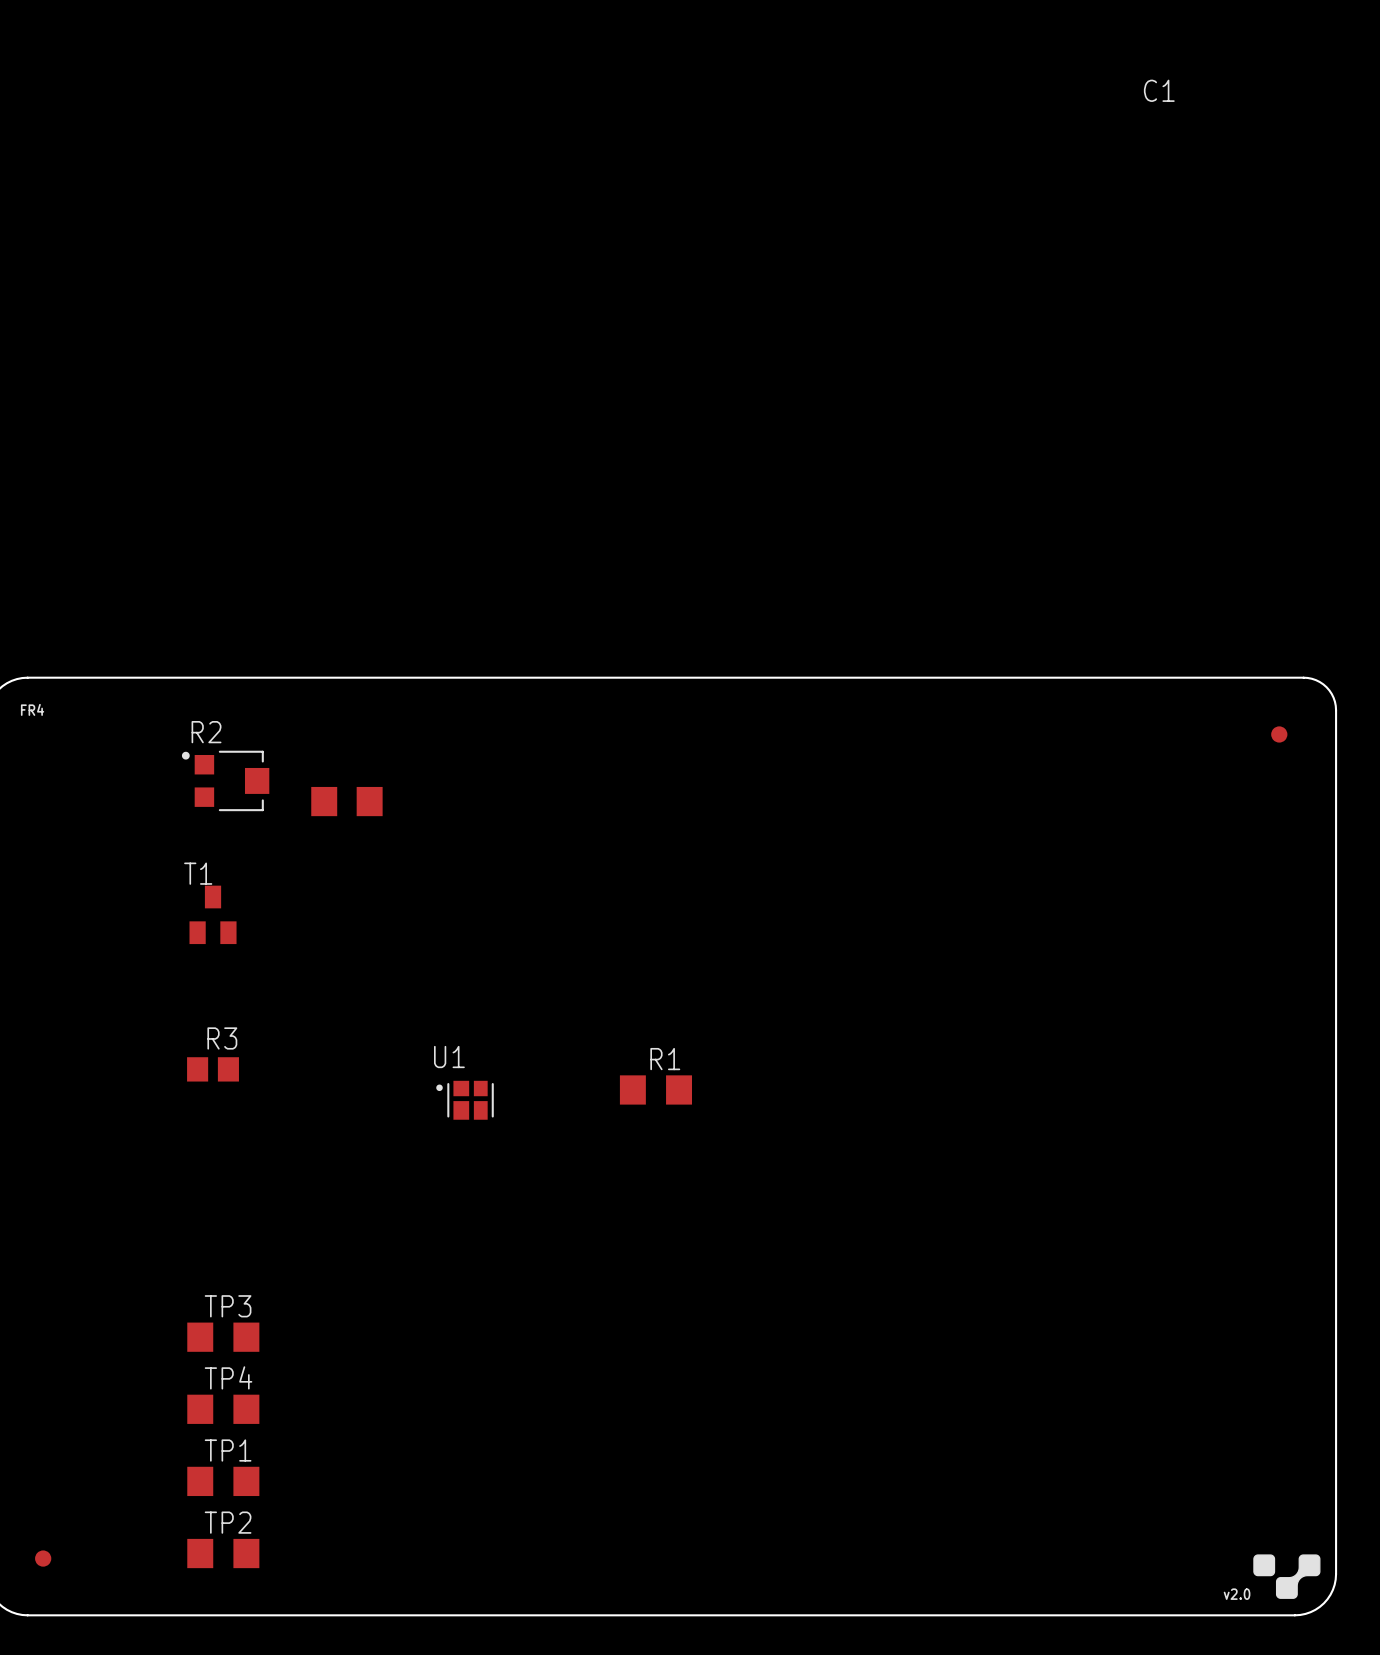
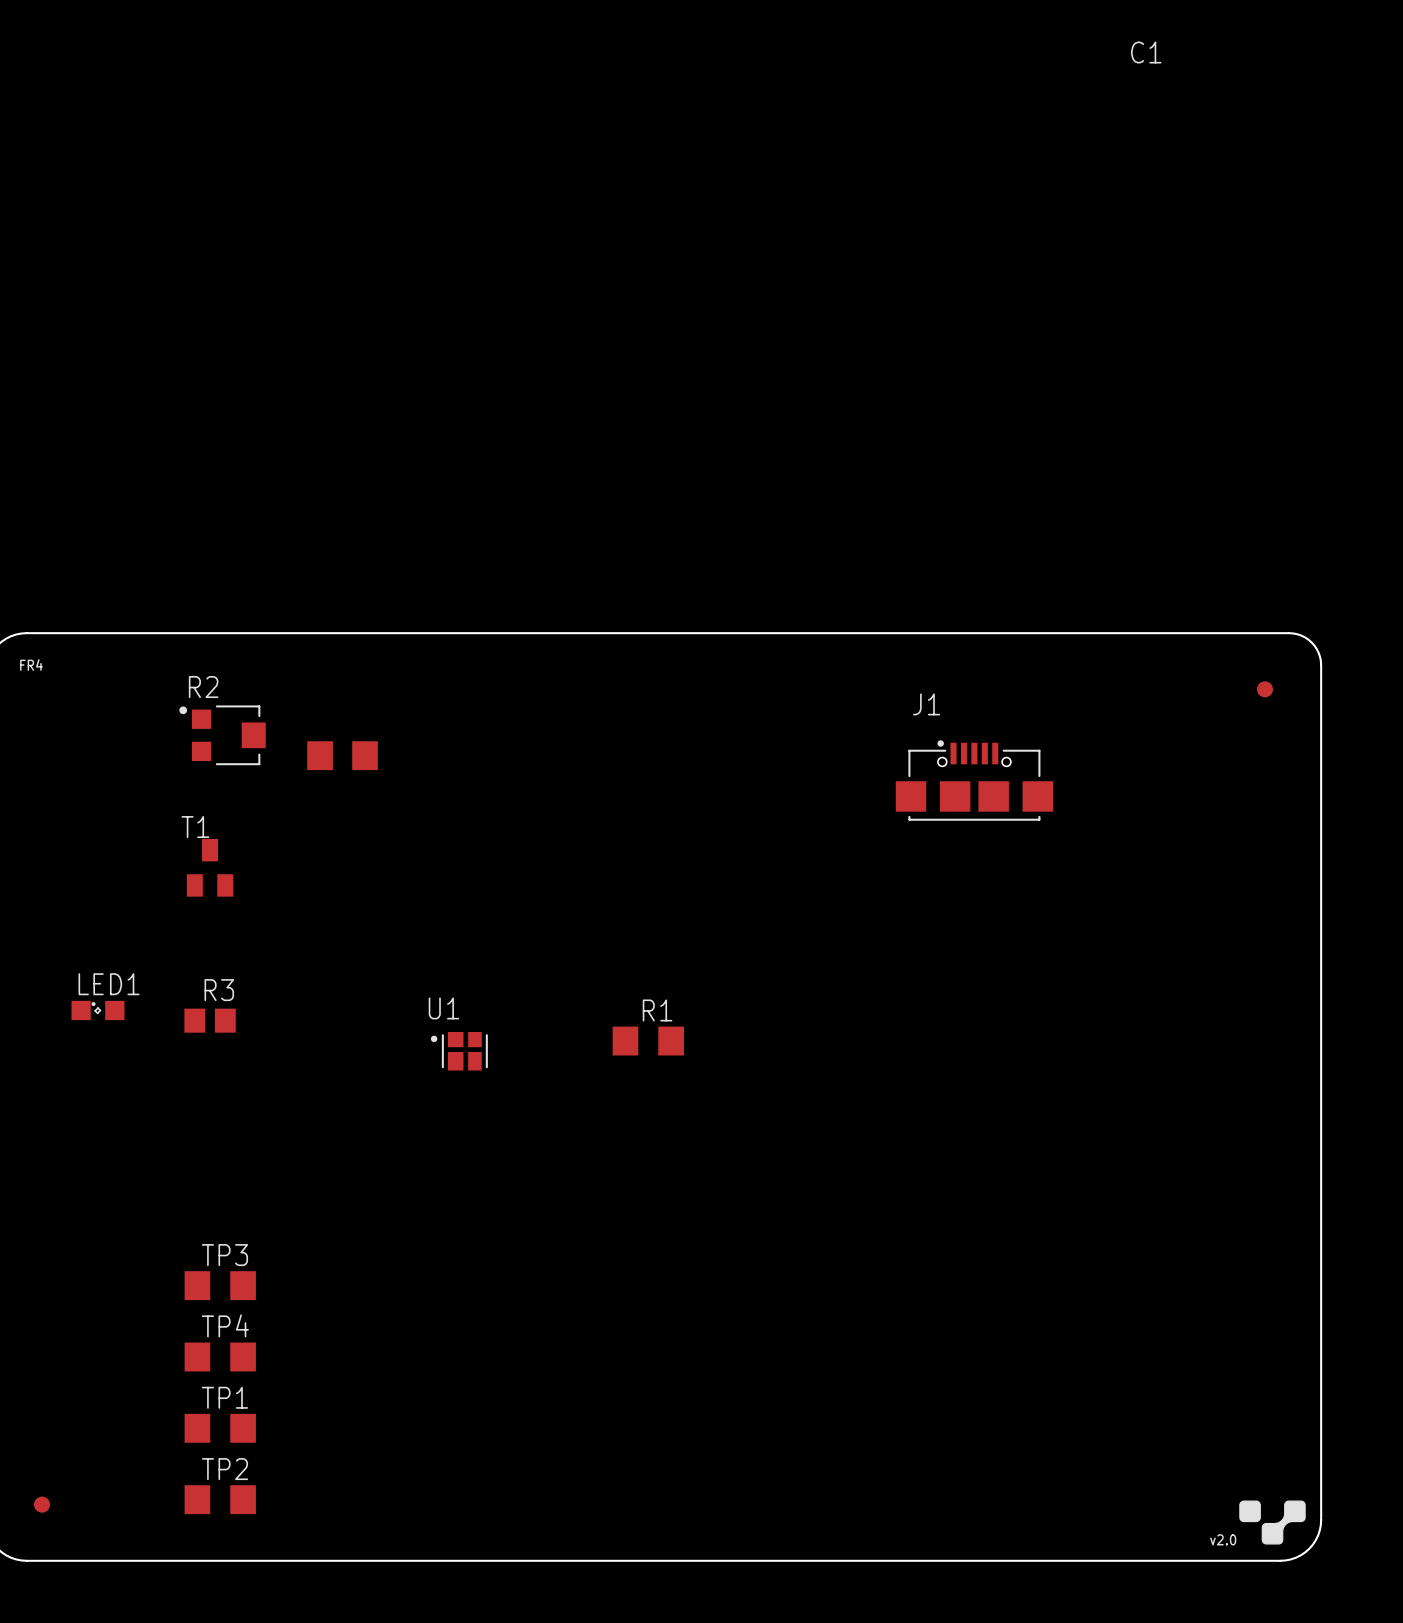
J1: none -> (974, 780)
LED1: none -> (97, 1010)

